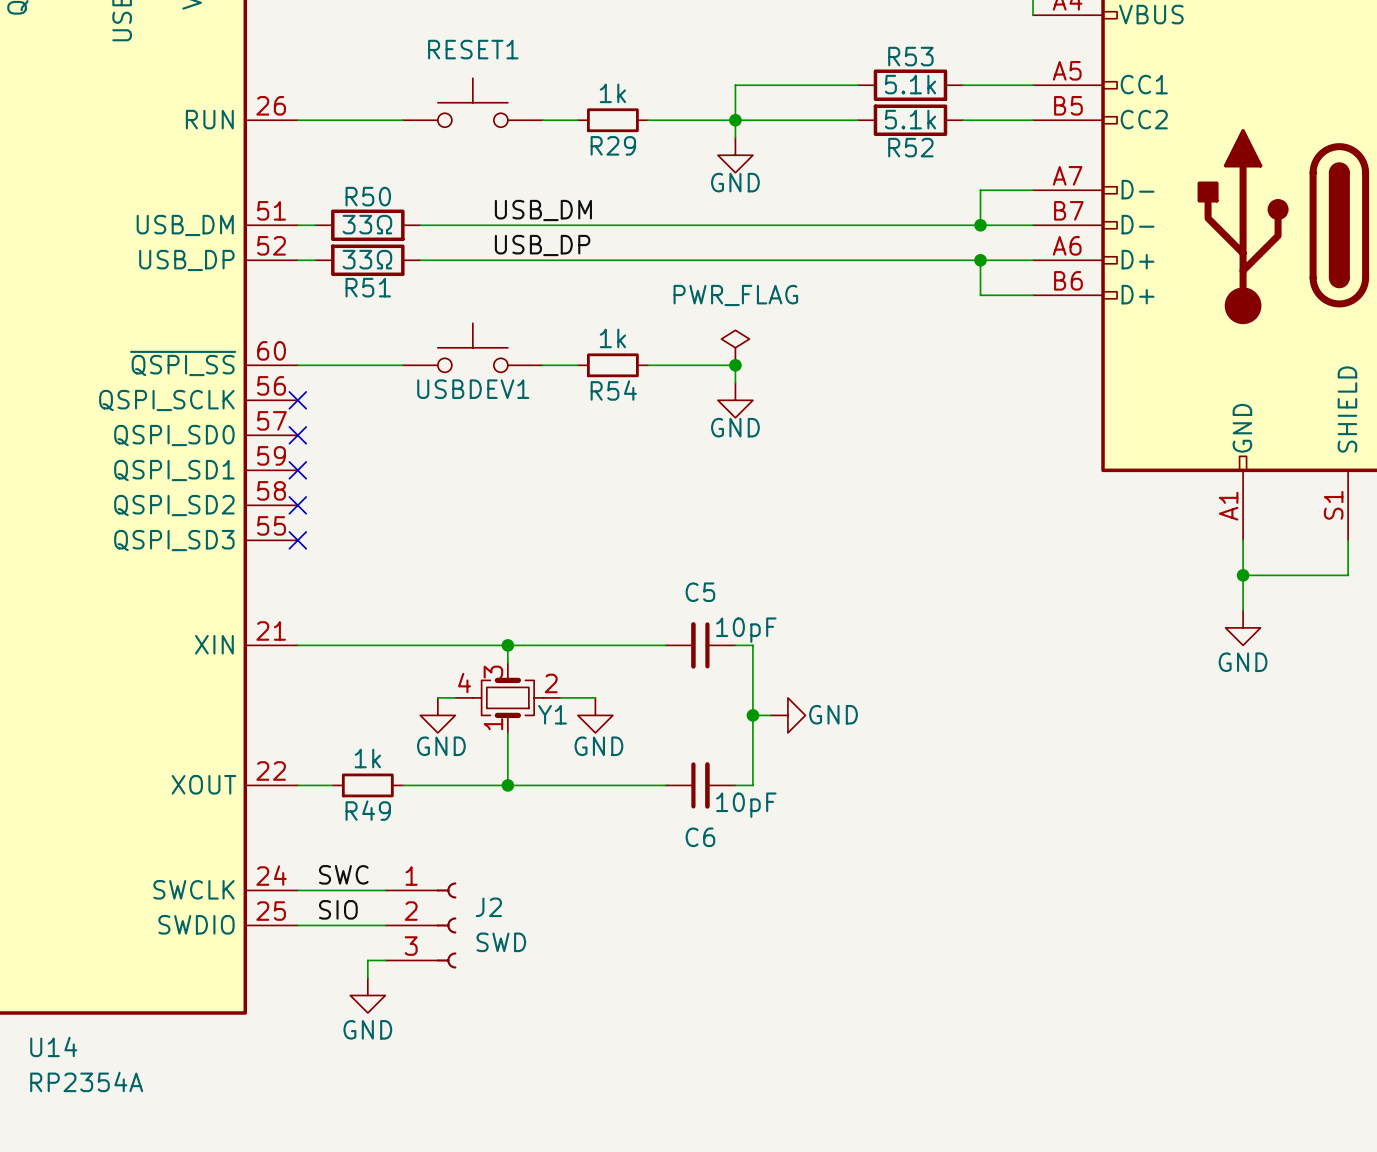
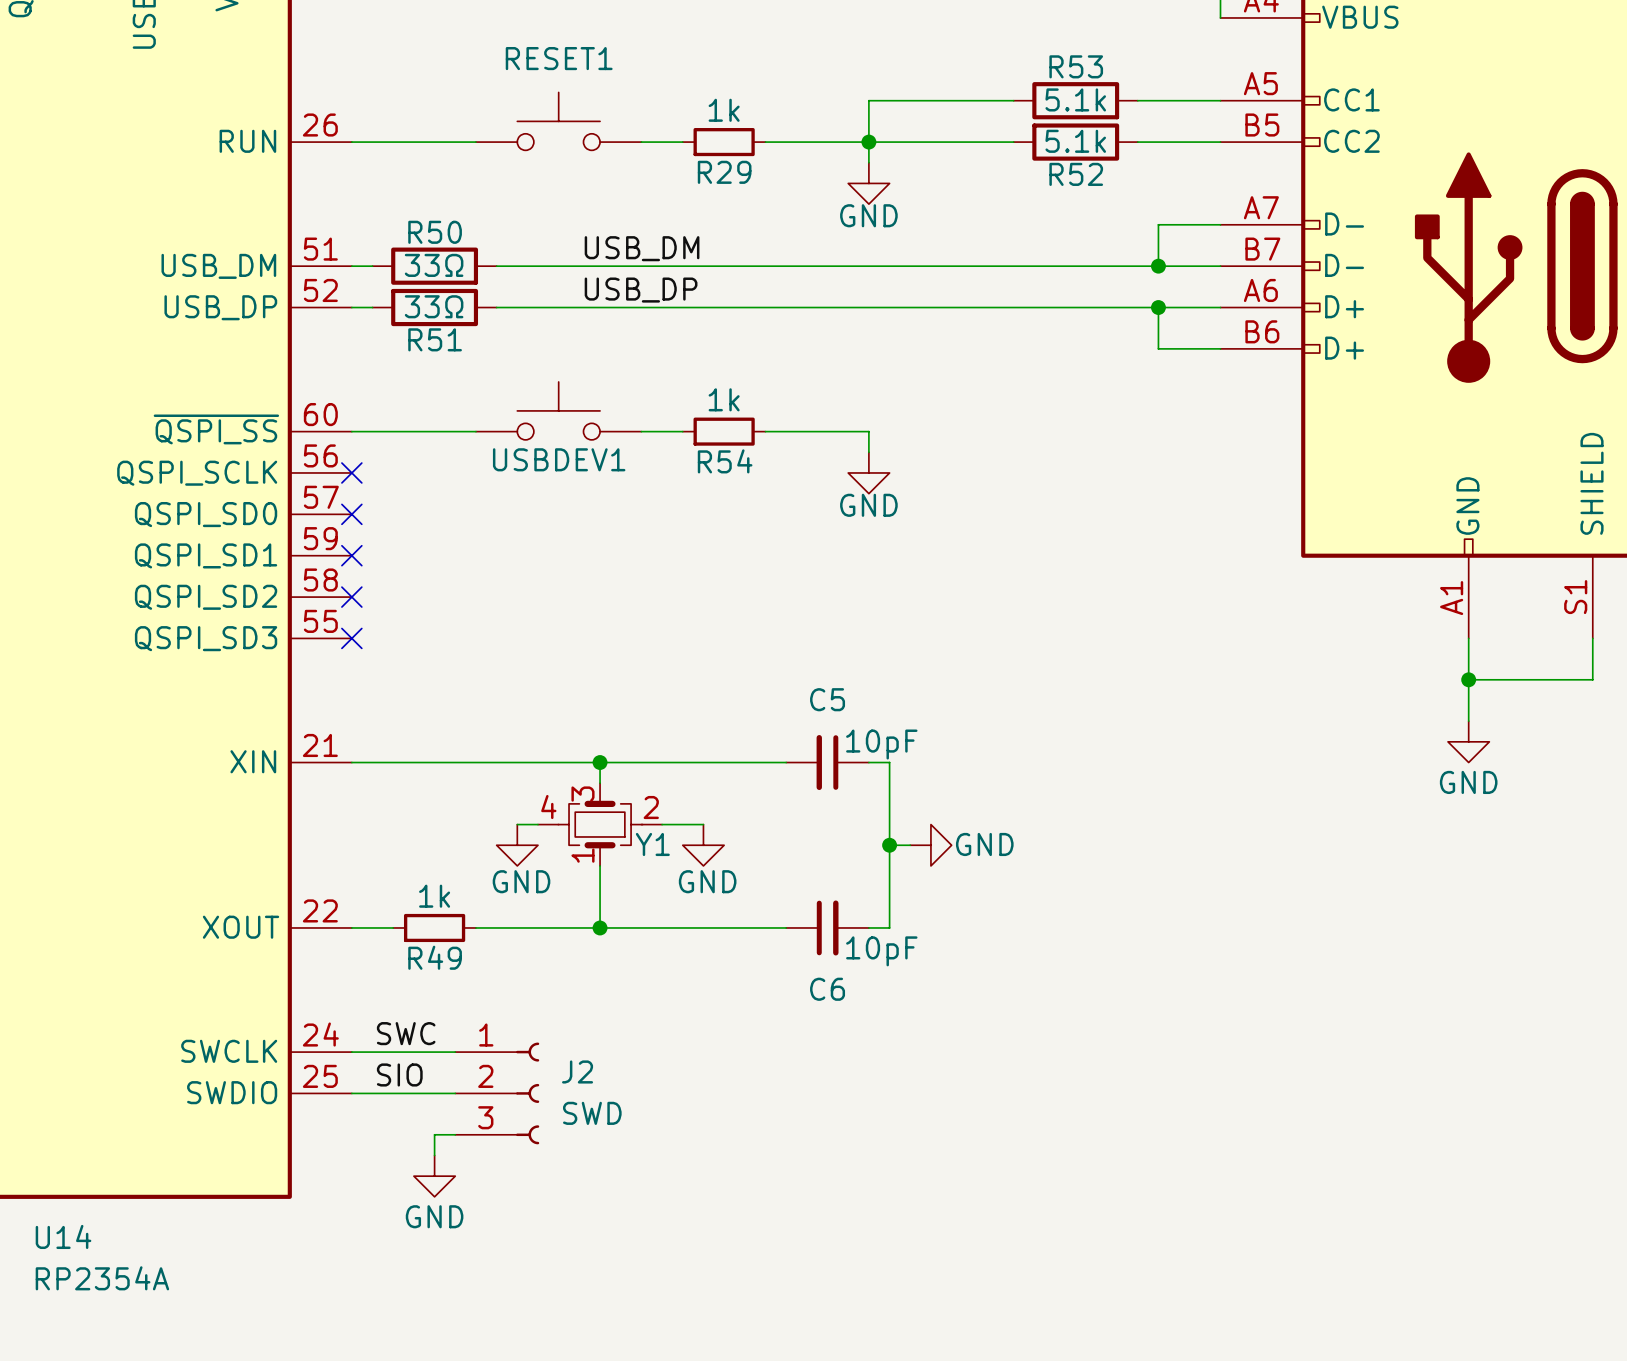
power symbol: PWR_FLAG (735, 347) -> none
junction: (735, 365) -> none

